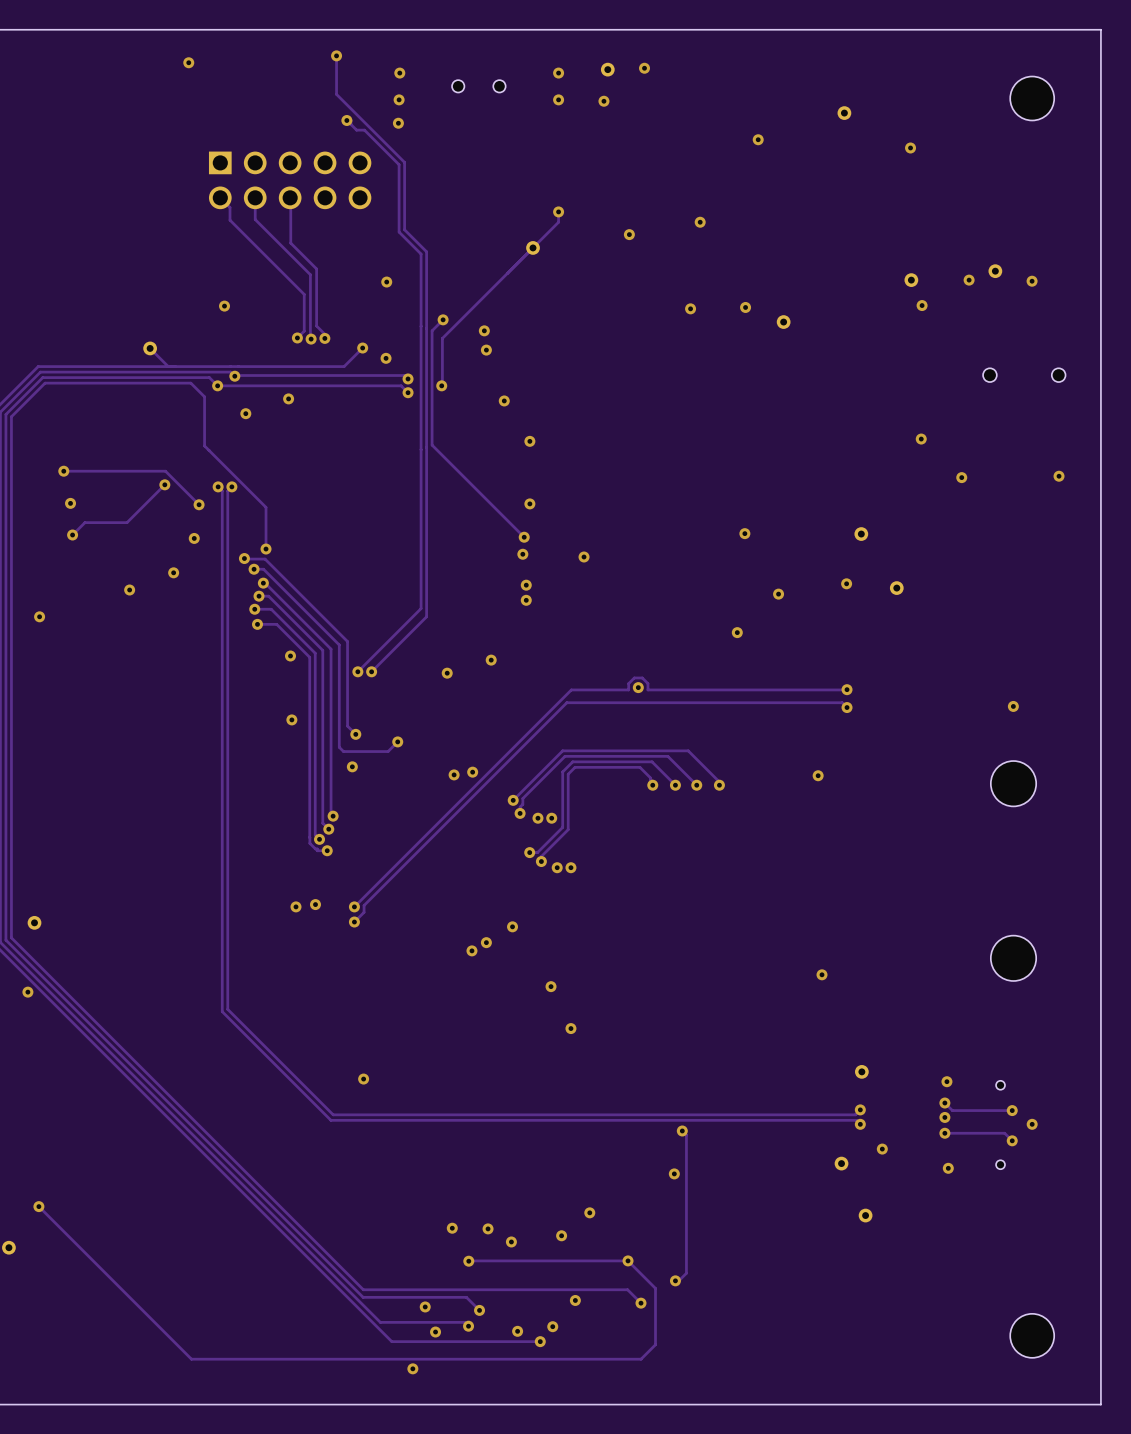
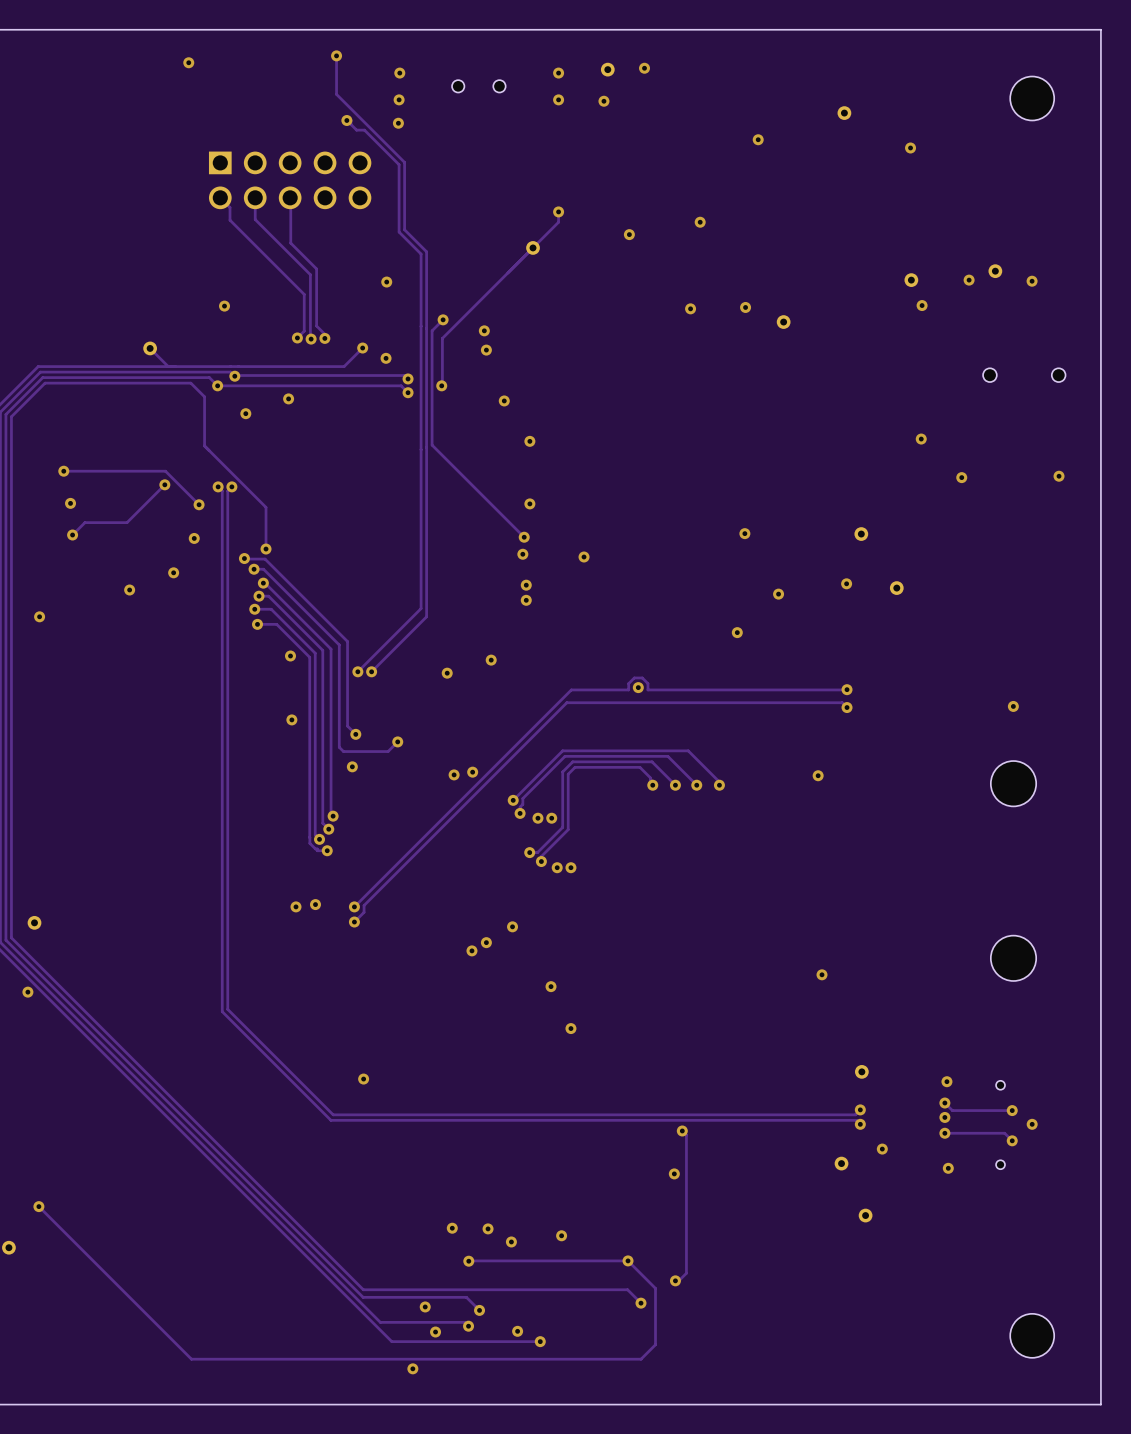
via: (589, 1212) -> none
via: (575, 1300) -> none
via: (552, 1326) -> none

